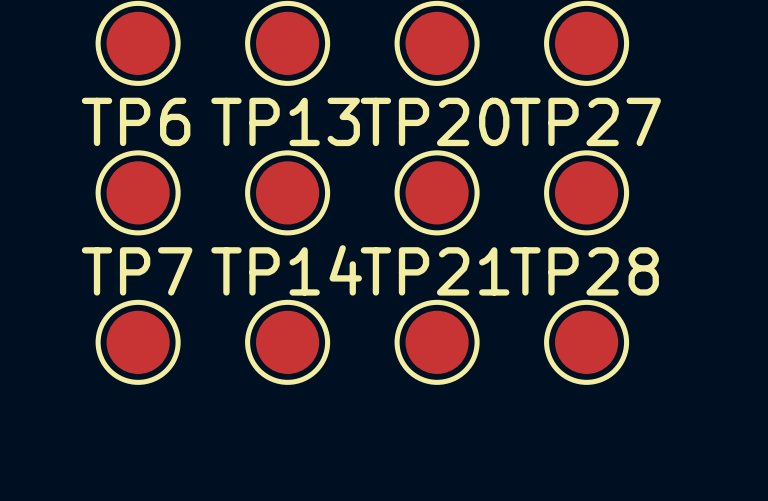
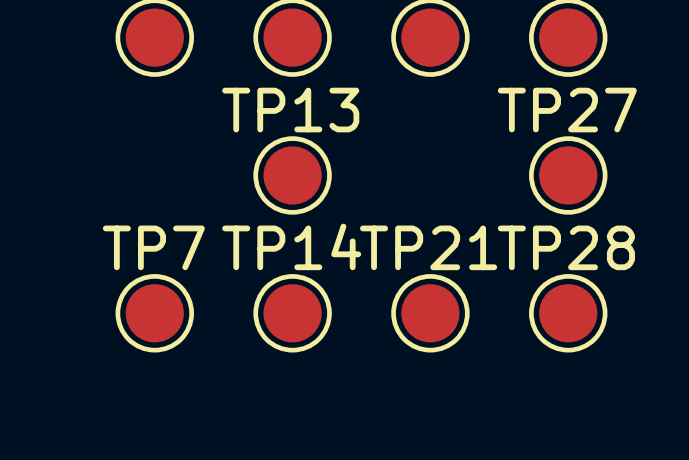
TP6: (138, 192) -> none
TP20: (437, 192) -> none

